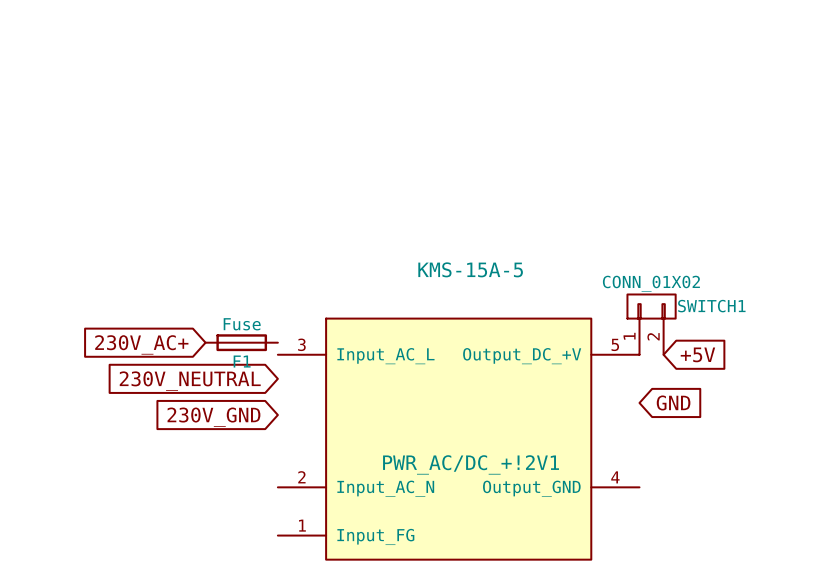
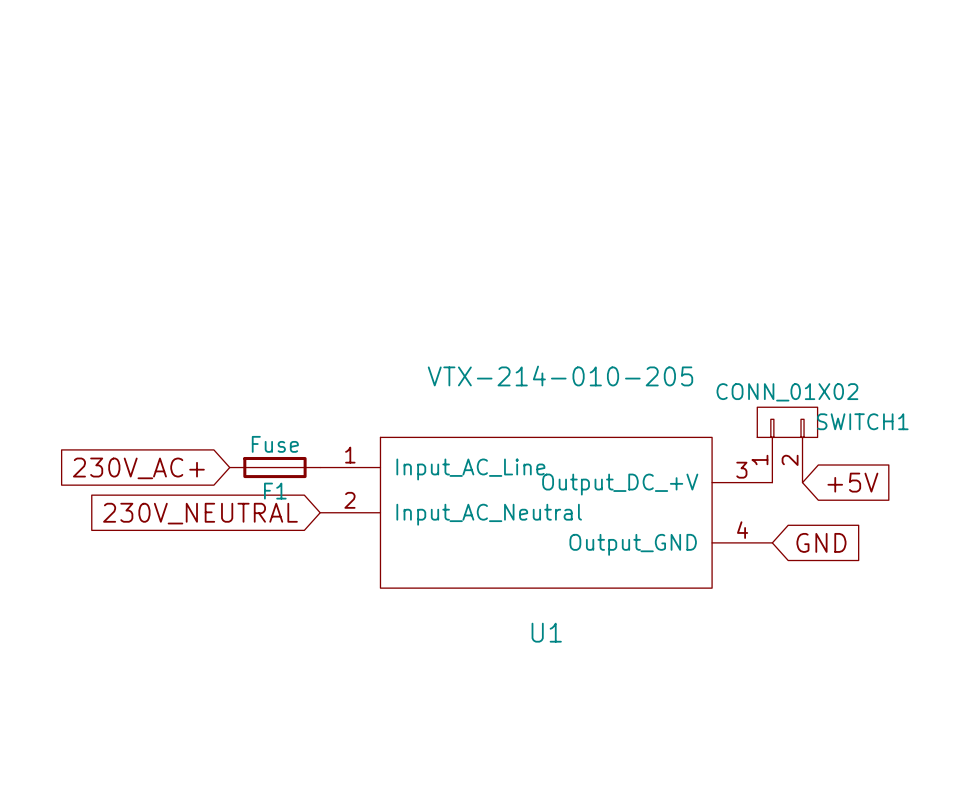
U1: none -> VTX-214-010-205 (546, 512)
global label: 230V_GND (213, 417) -> none
PWR_AC/DC_+!2V1: KMS-15A-5 (458, 439) -> none

